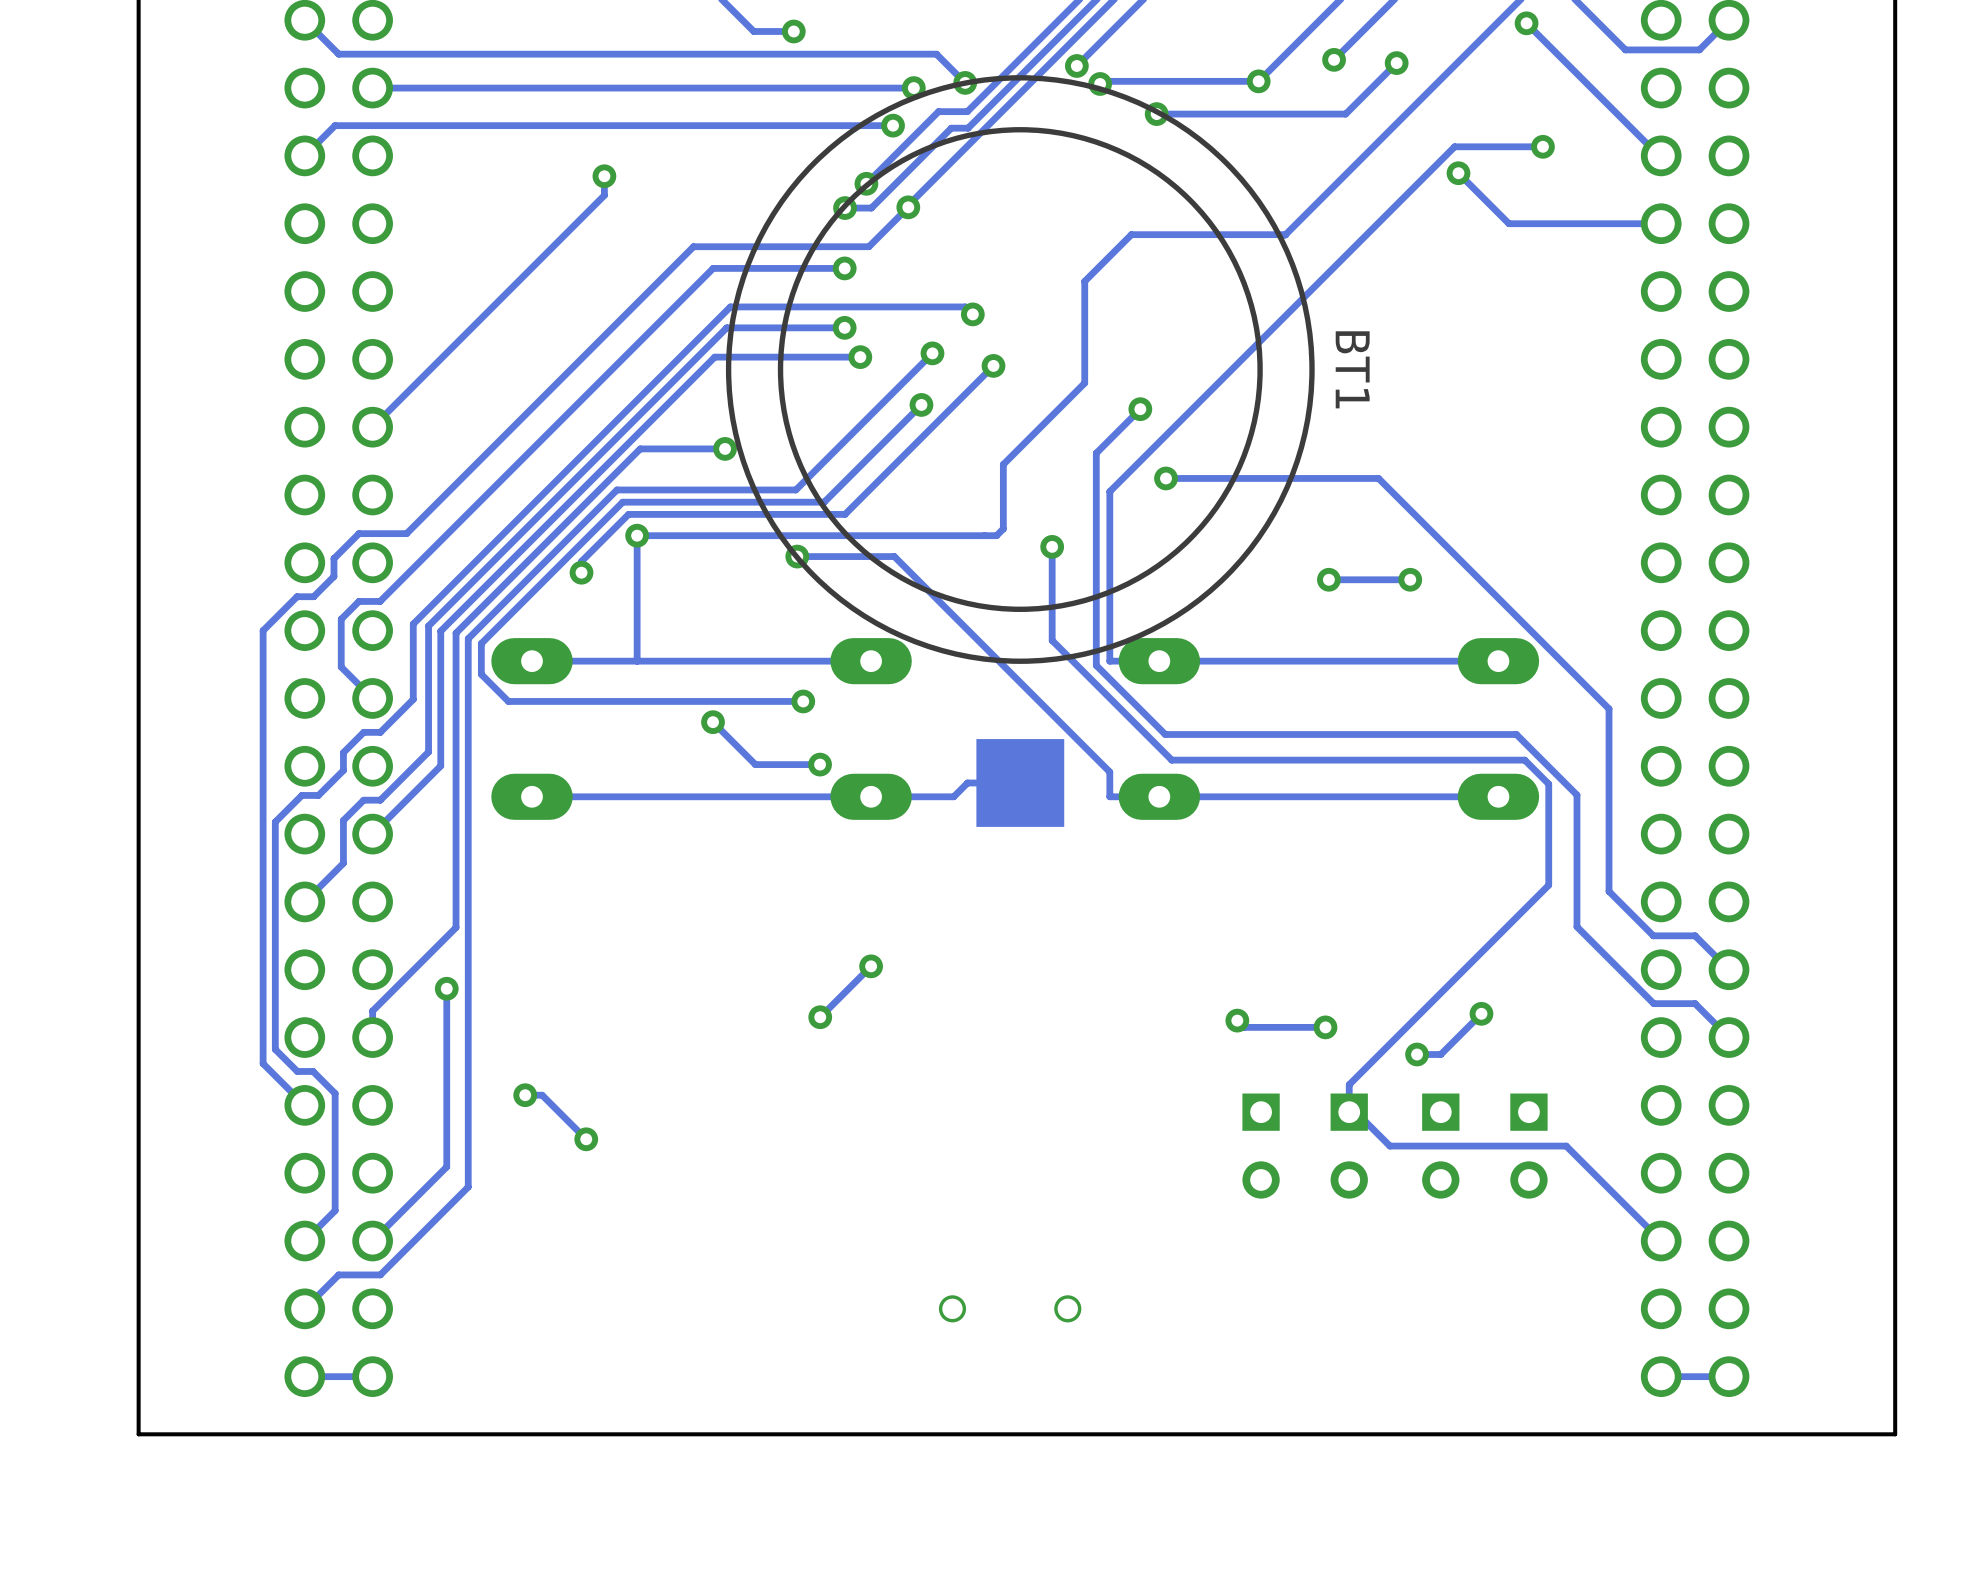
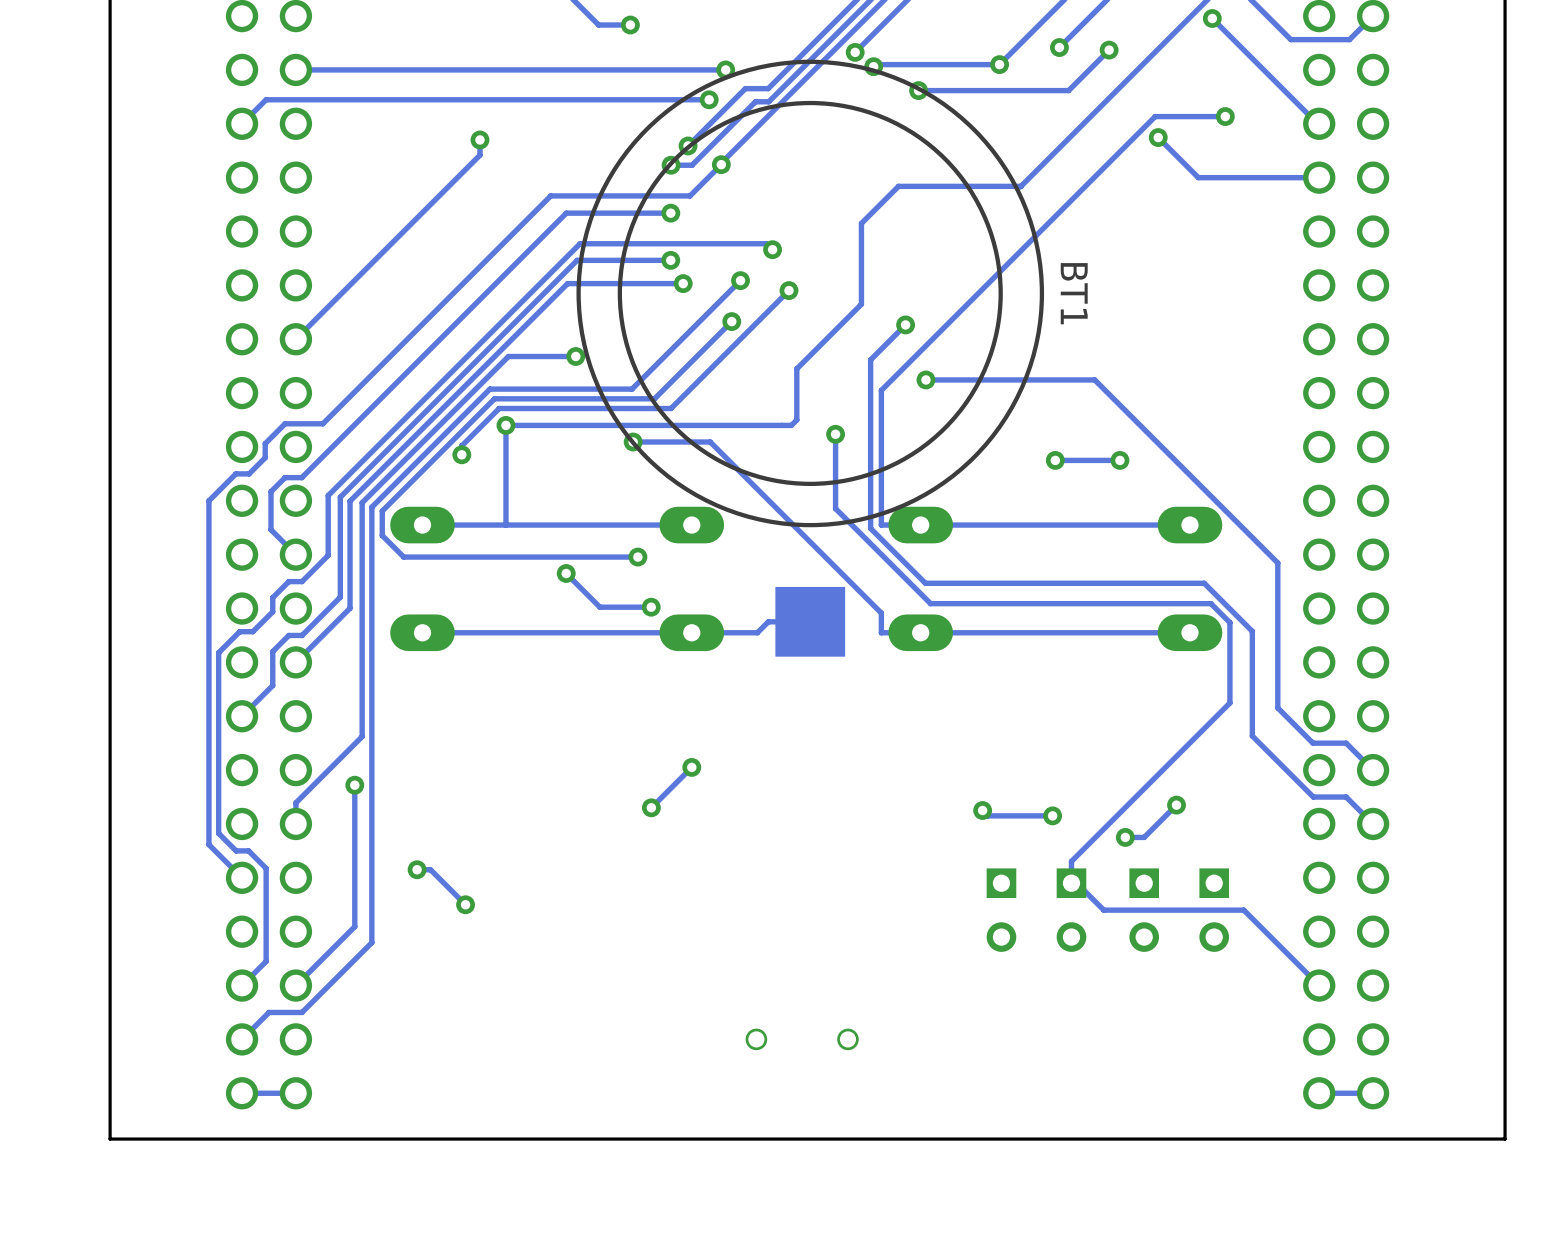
track: (304, 20) (338, 54) (936, 54) (965, 82) -> none
via: (965, 82) -> none

